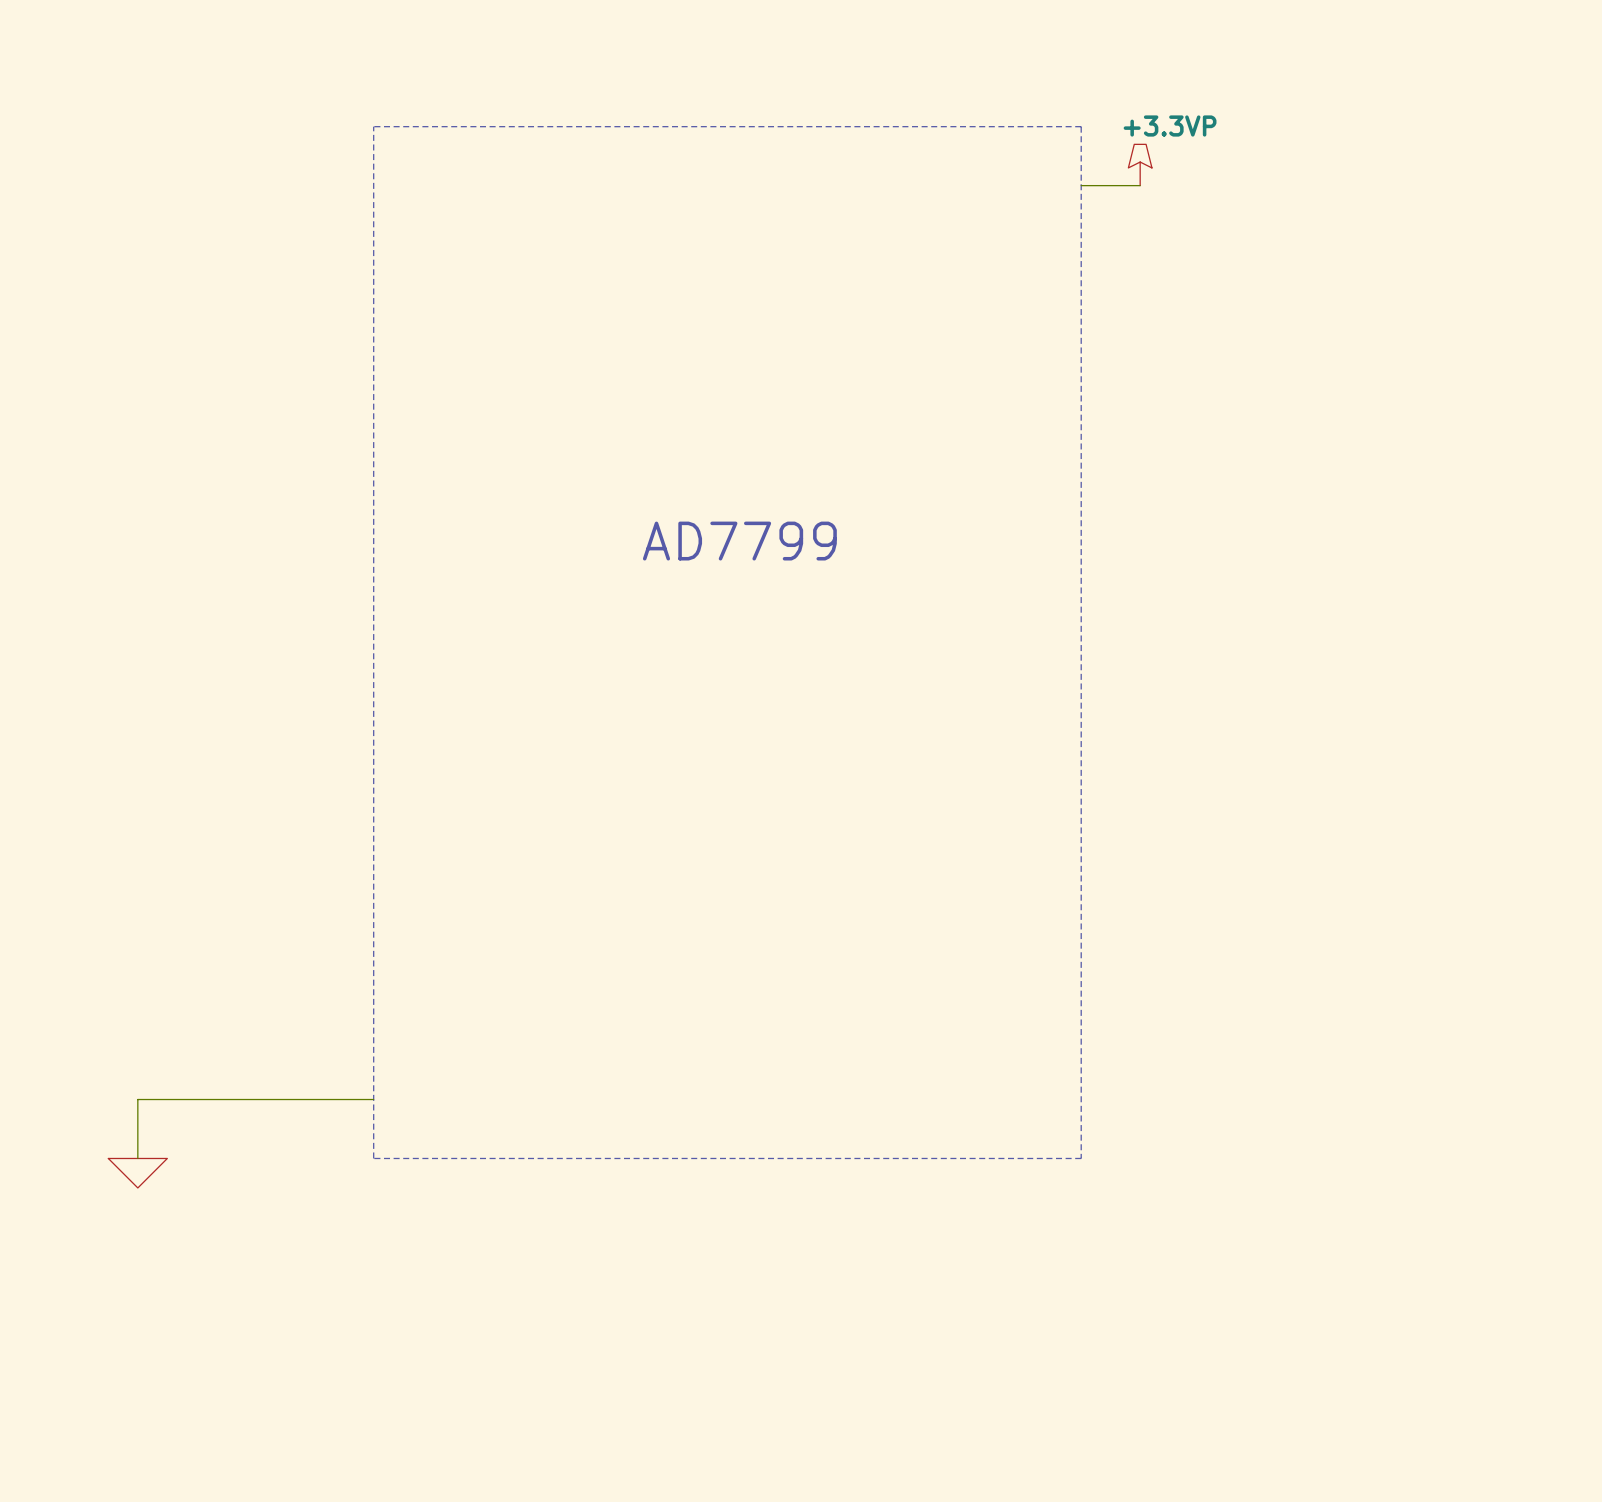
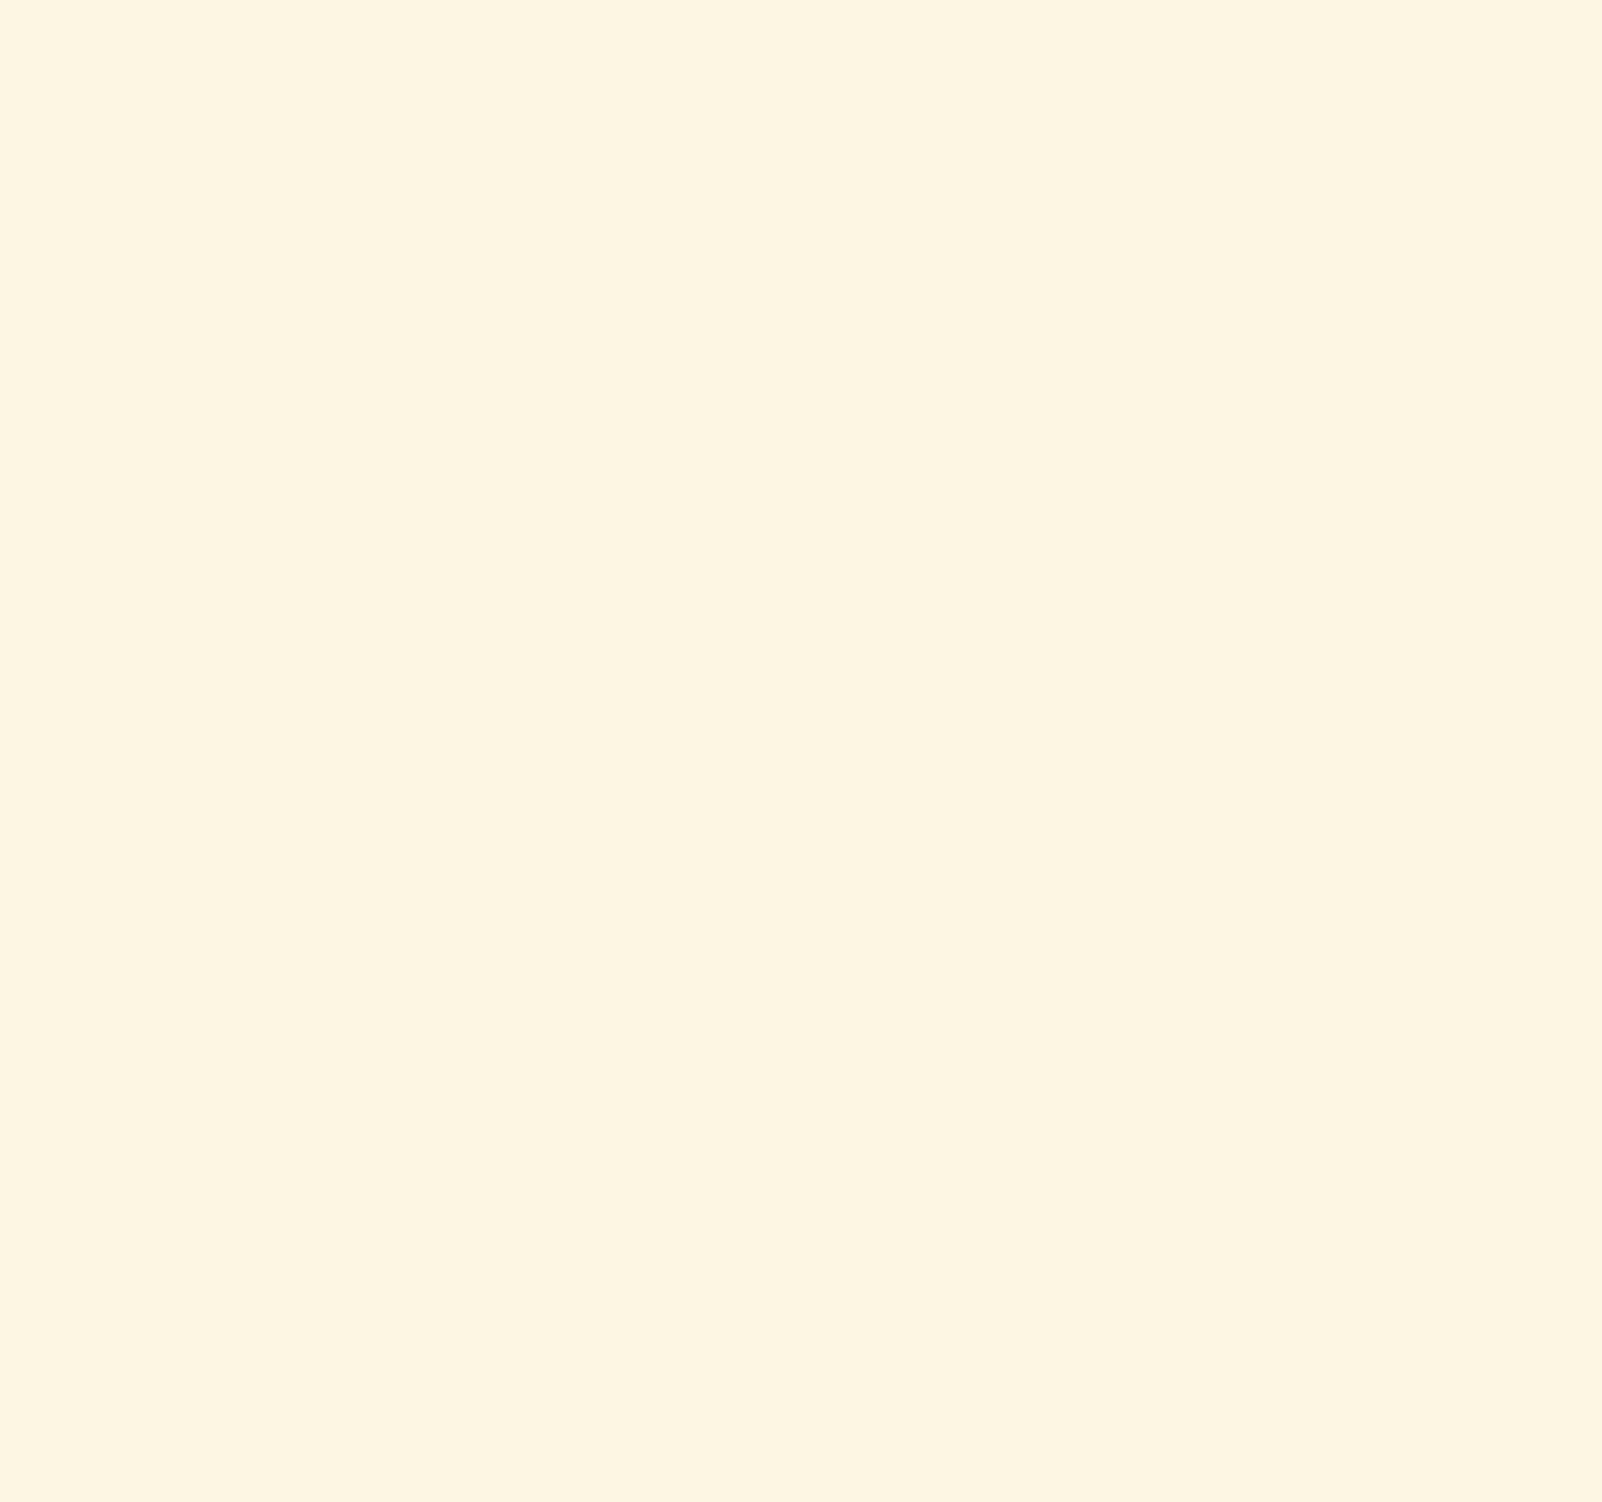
line: (373, 126) (1081, 126) (1081, 1158) (373, 1158) (373, 126) -> none
power symbol: +3.3VP (1140, 164) -> none
wire: (1081, 185) (1140, 185) -> none
text: AD7799 (739, 541) -> none
wire: (373, 1099) (137, 1099) (137, 1158) -> none
power symbol: (137, 1173) -> none

